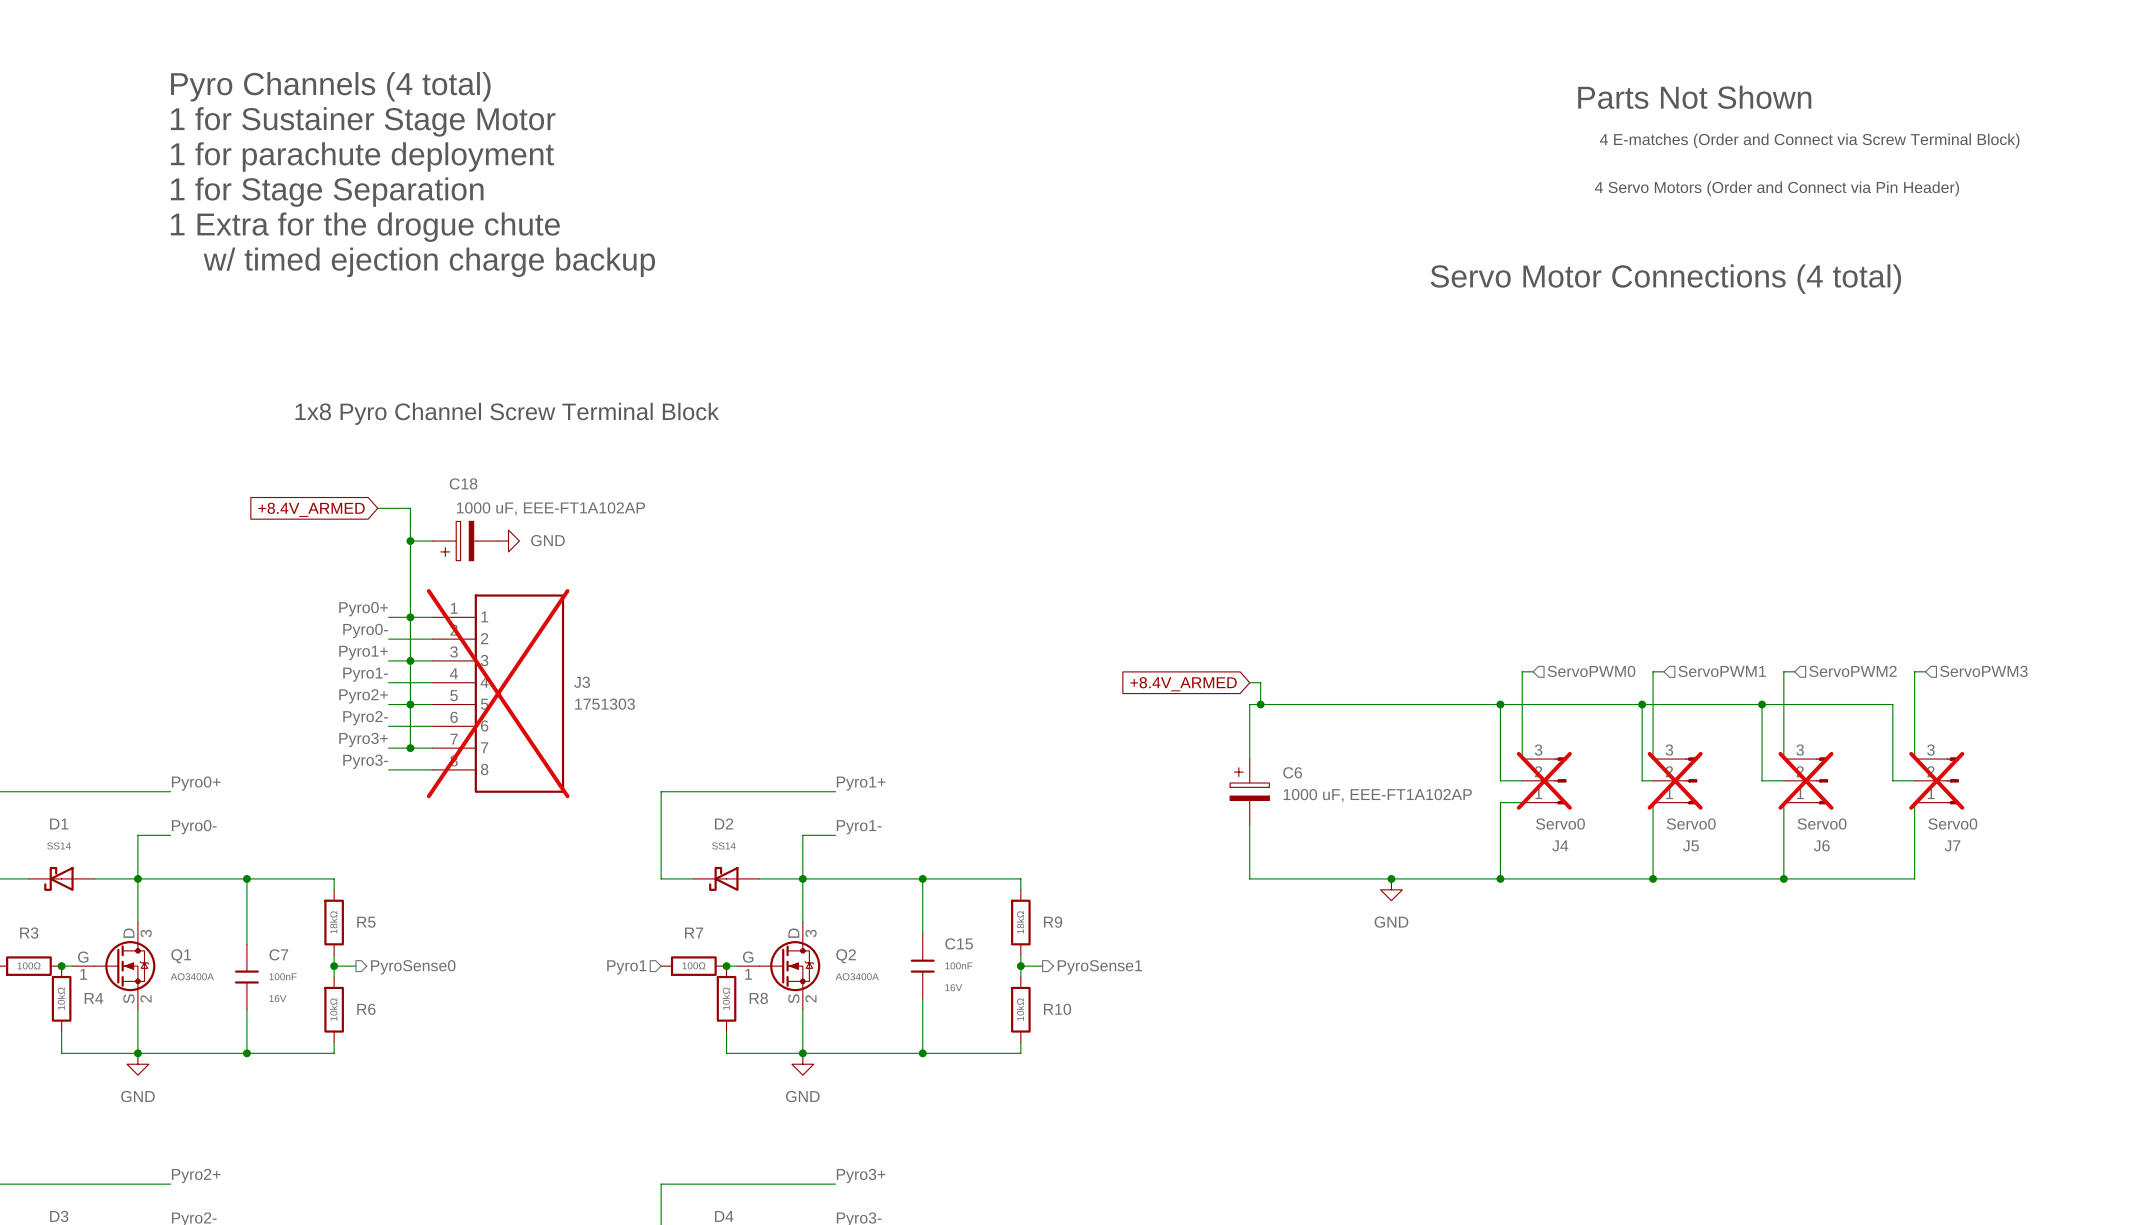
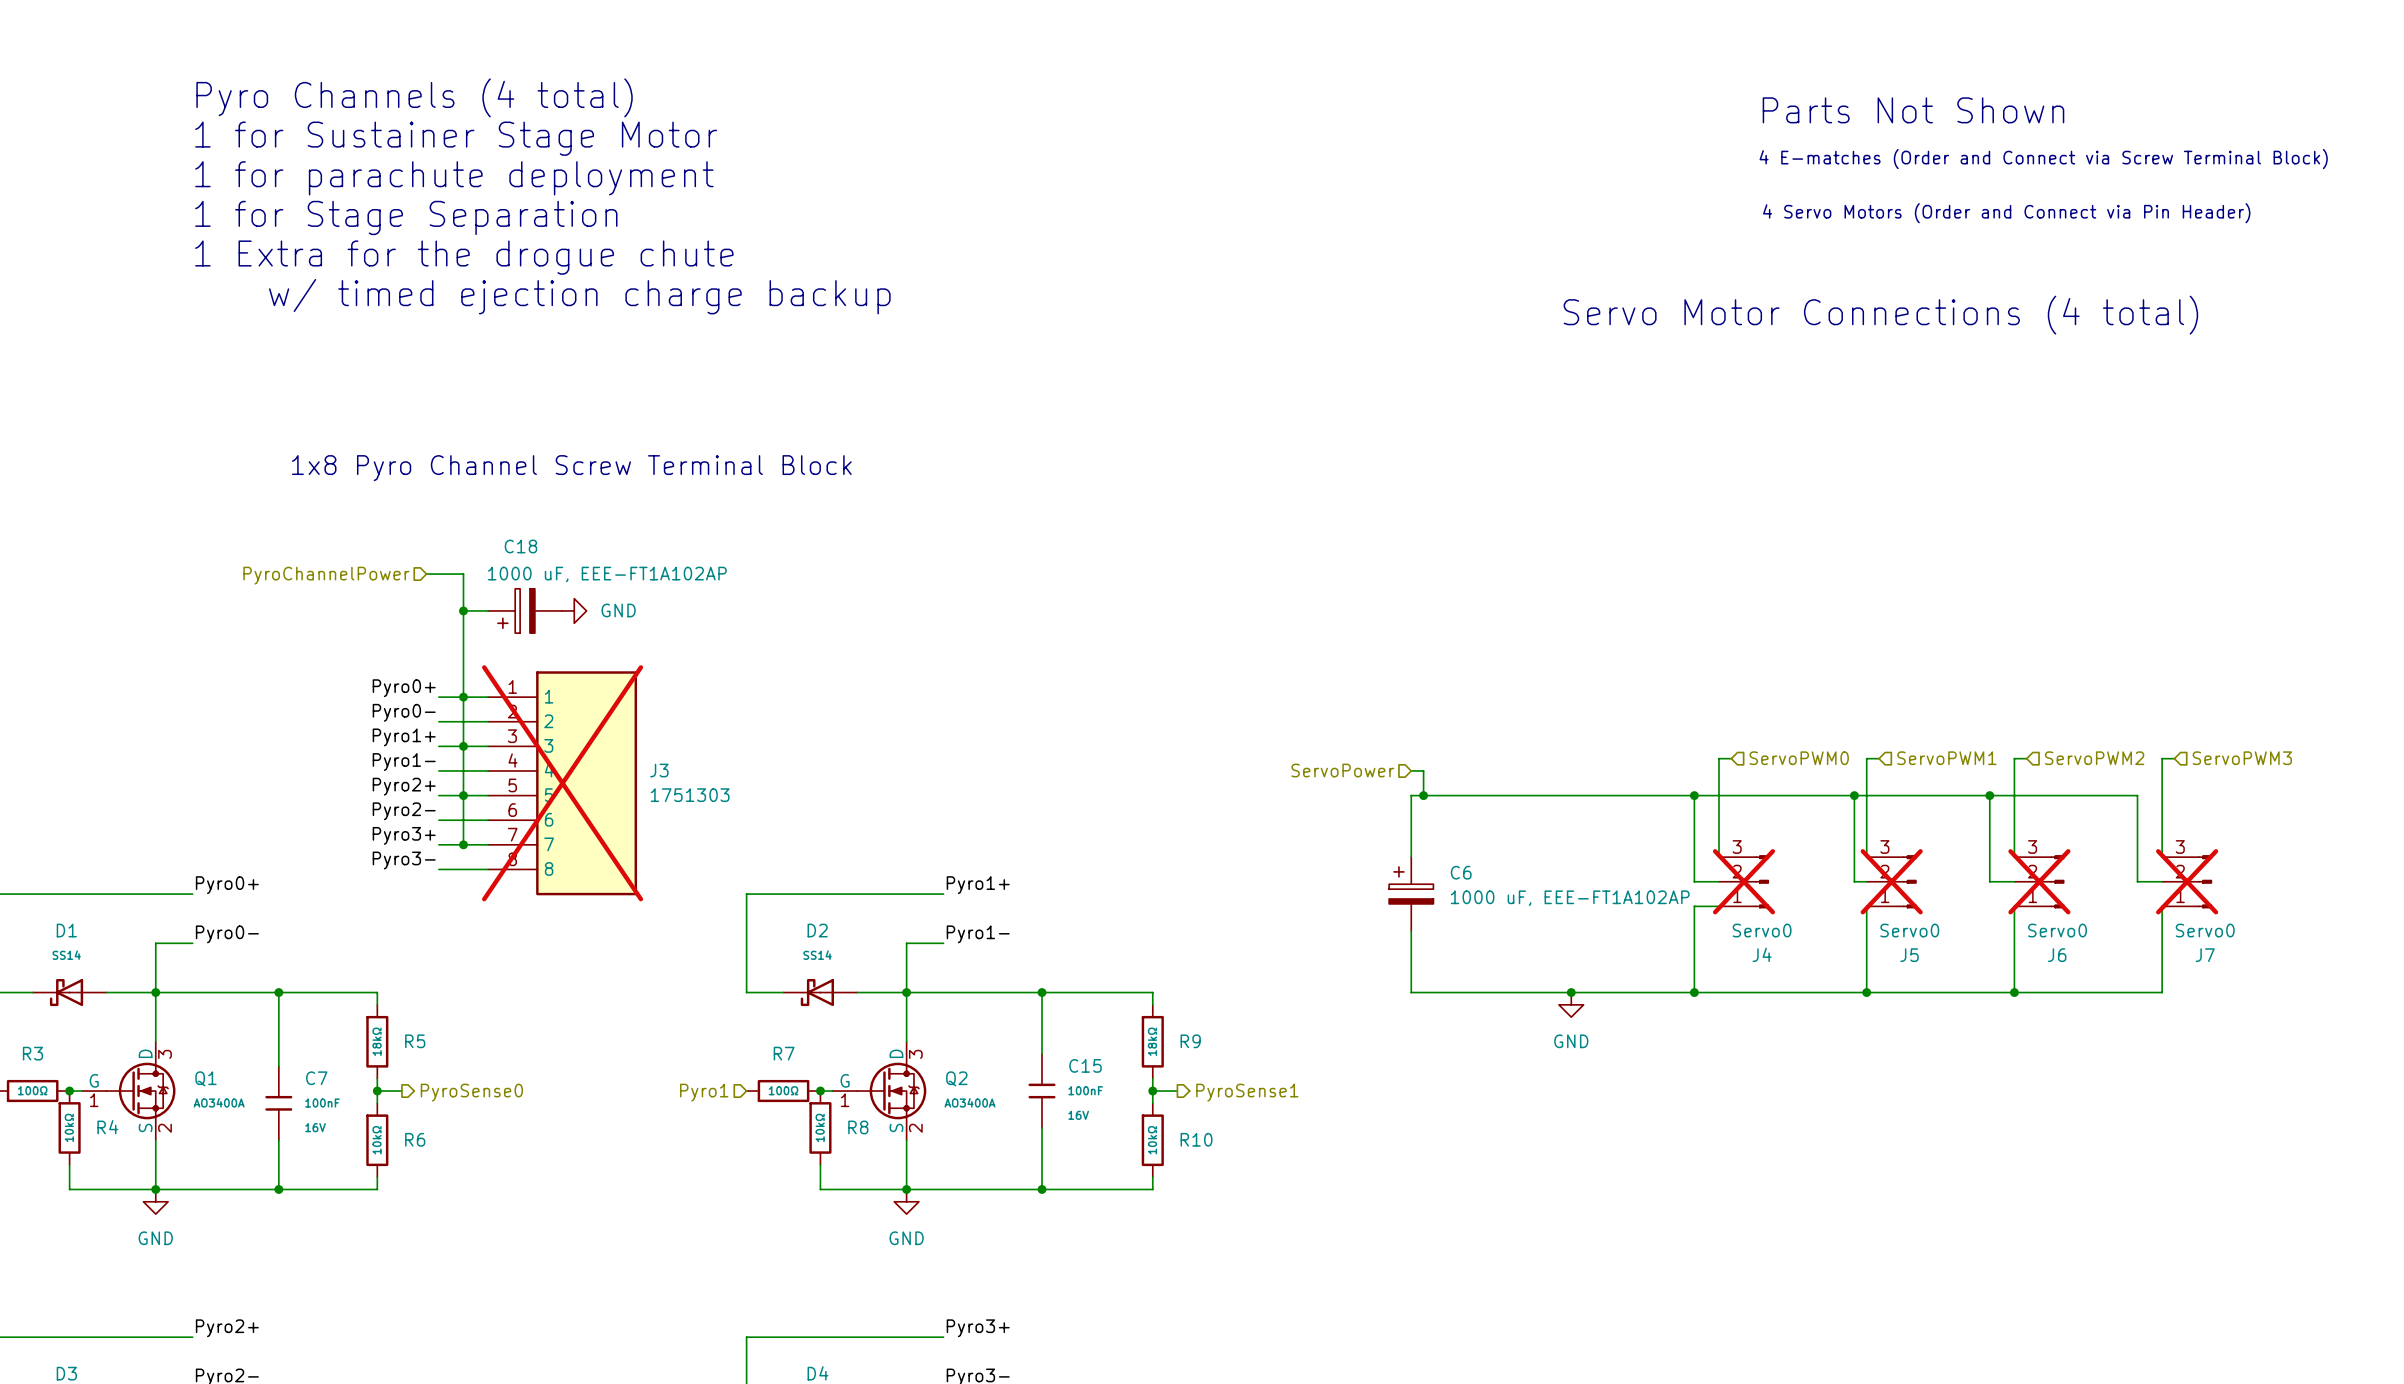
hierarchical label: none -> PyroChannelPower (326, 575)
global label: +8.4V_ARMED (311, 509) -> none
hierarchical label: none -> ServoPower (1342, 770)
global label: +8.4V_ARMED (1183, 684) -> none

